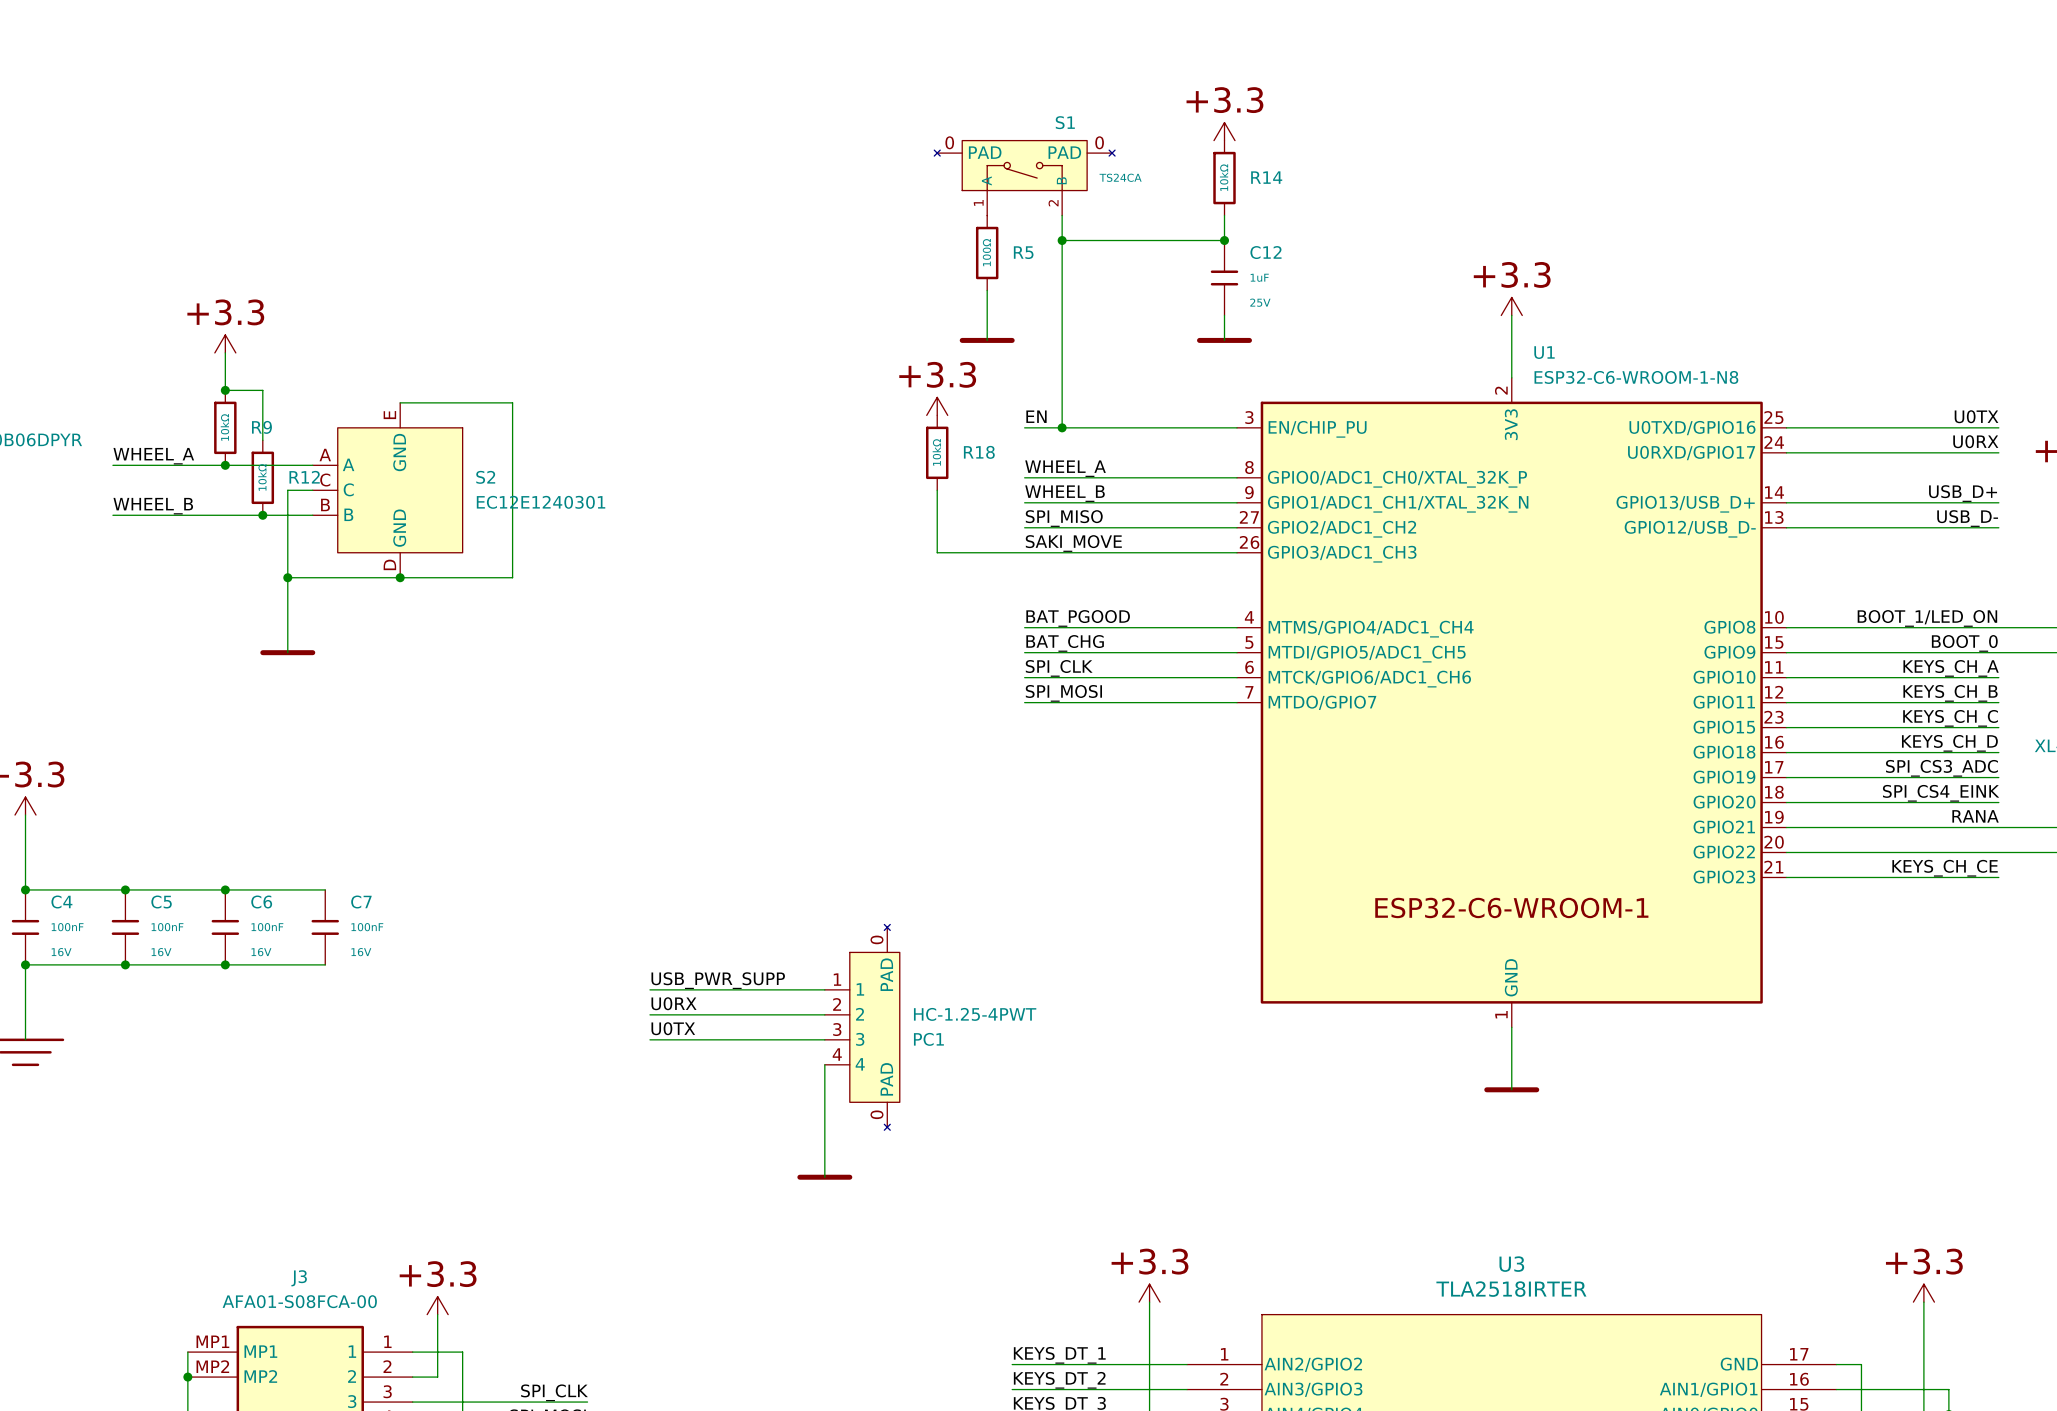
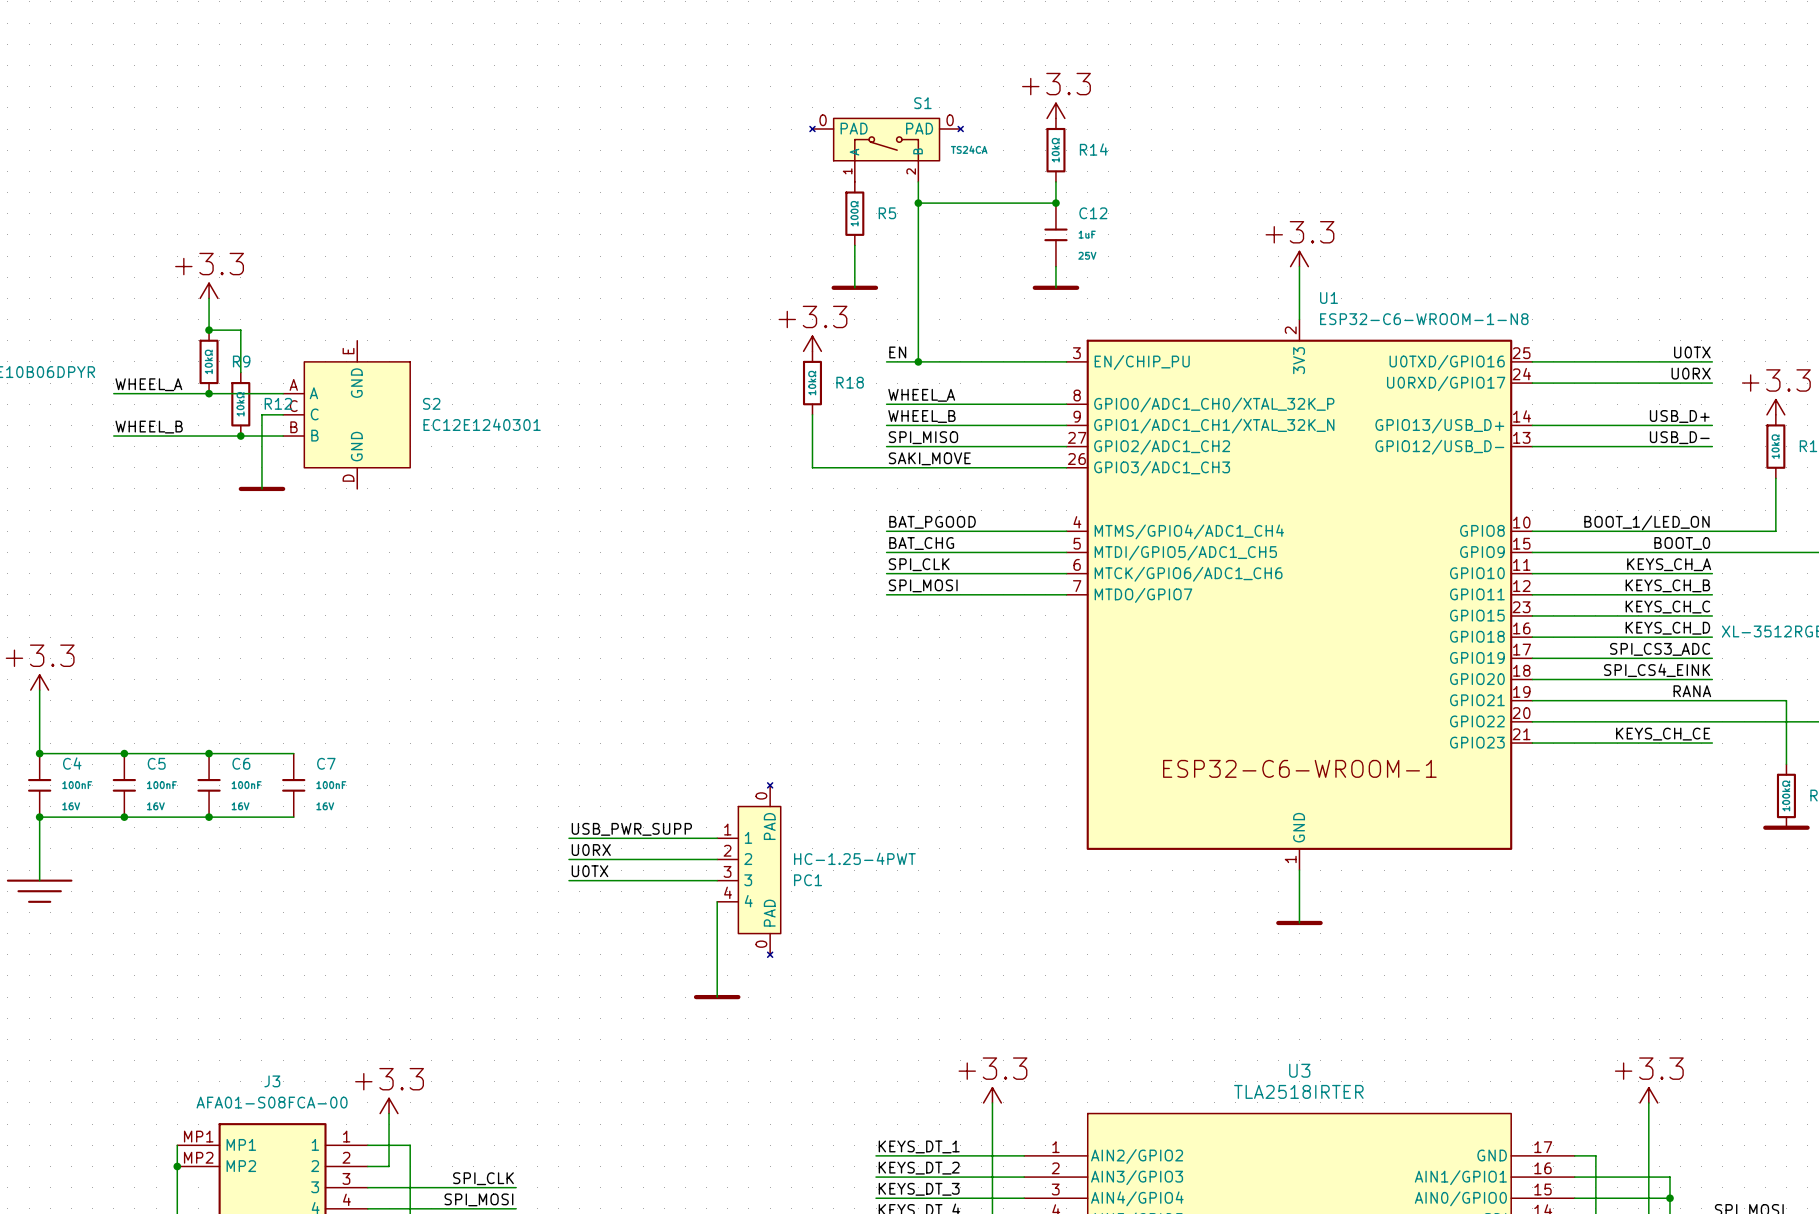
wire: (400, 402) (512, 402) (512, 577) (287, 577) (287, 652) -> none
junction: (287, 577) -> none
junction: (400, 577) -> none
power symbol position: (287, 652) -> (261, 488)

